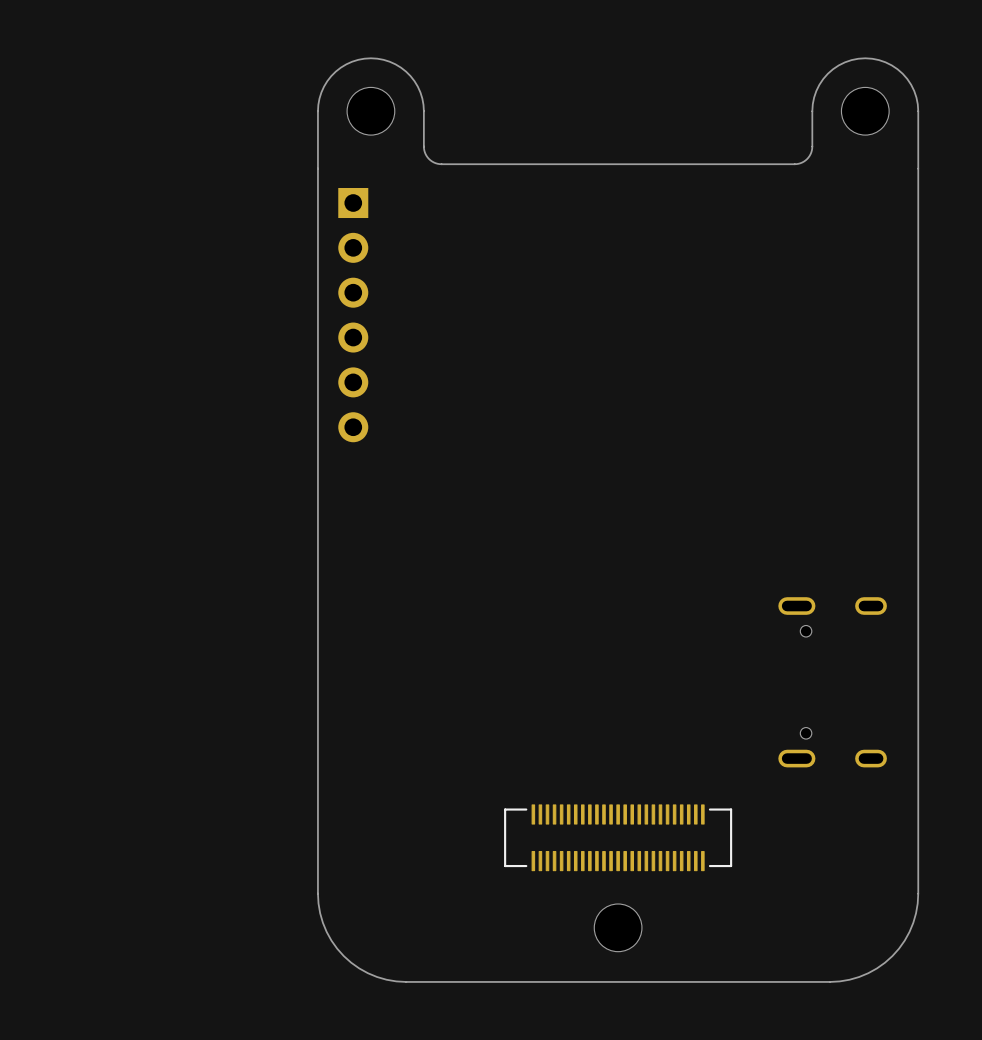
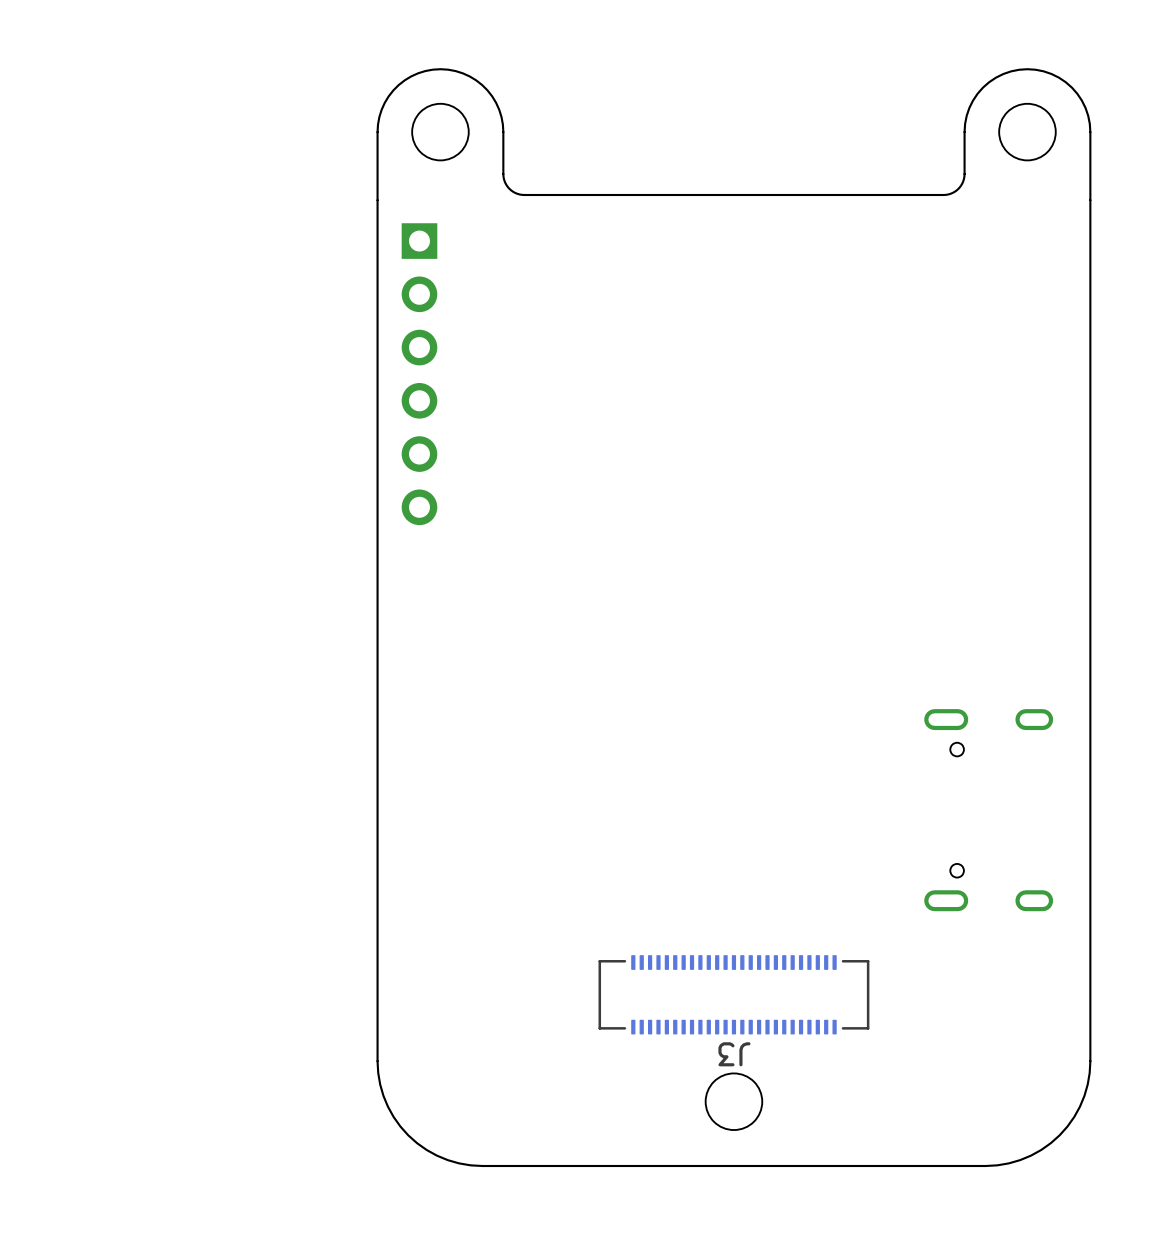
part: (618, 837) -> none
J3: none -> (733, 994)

